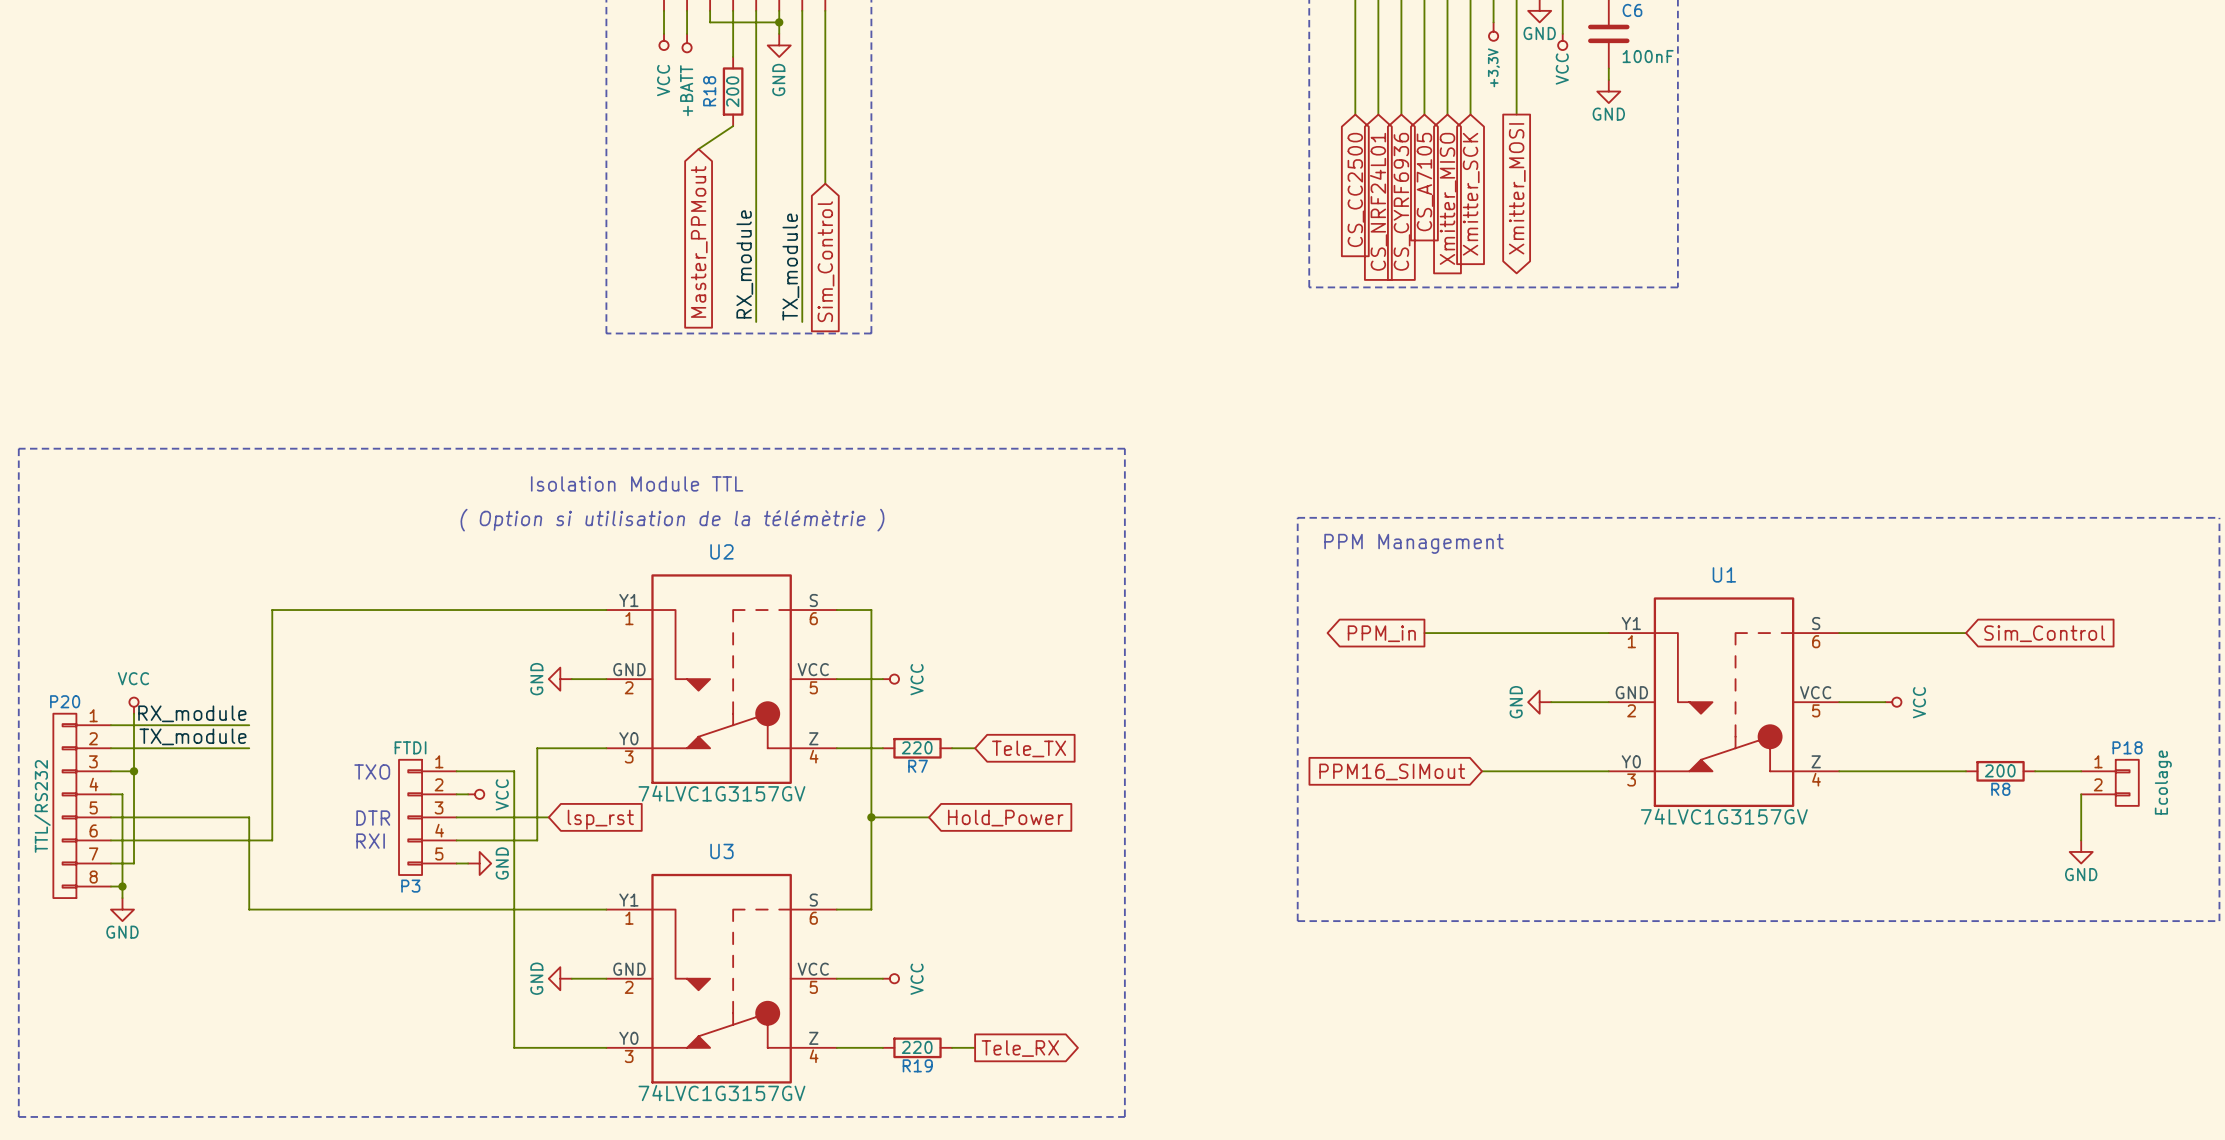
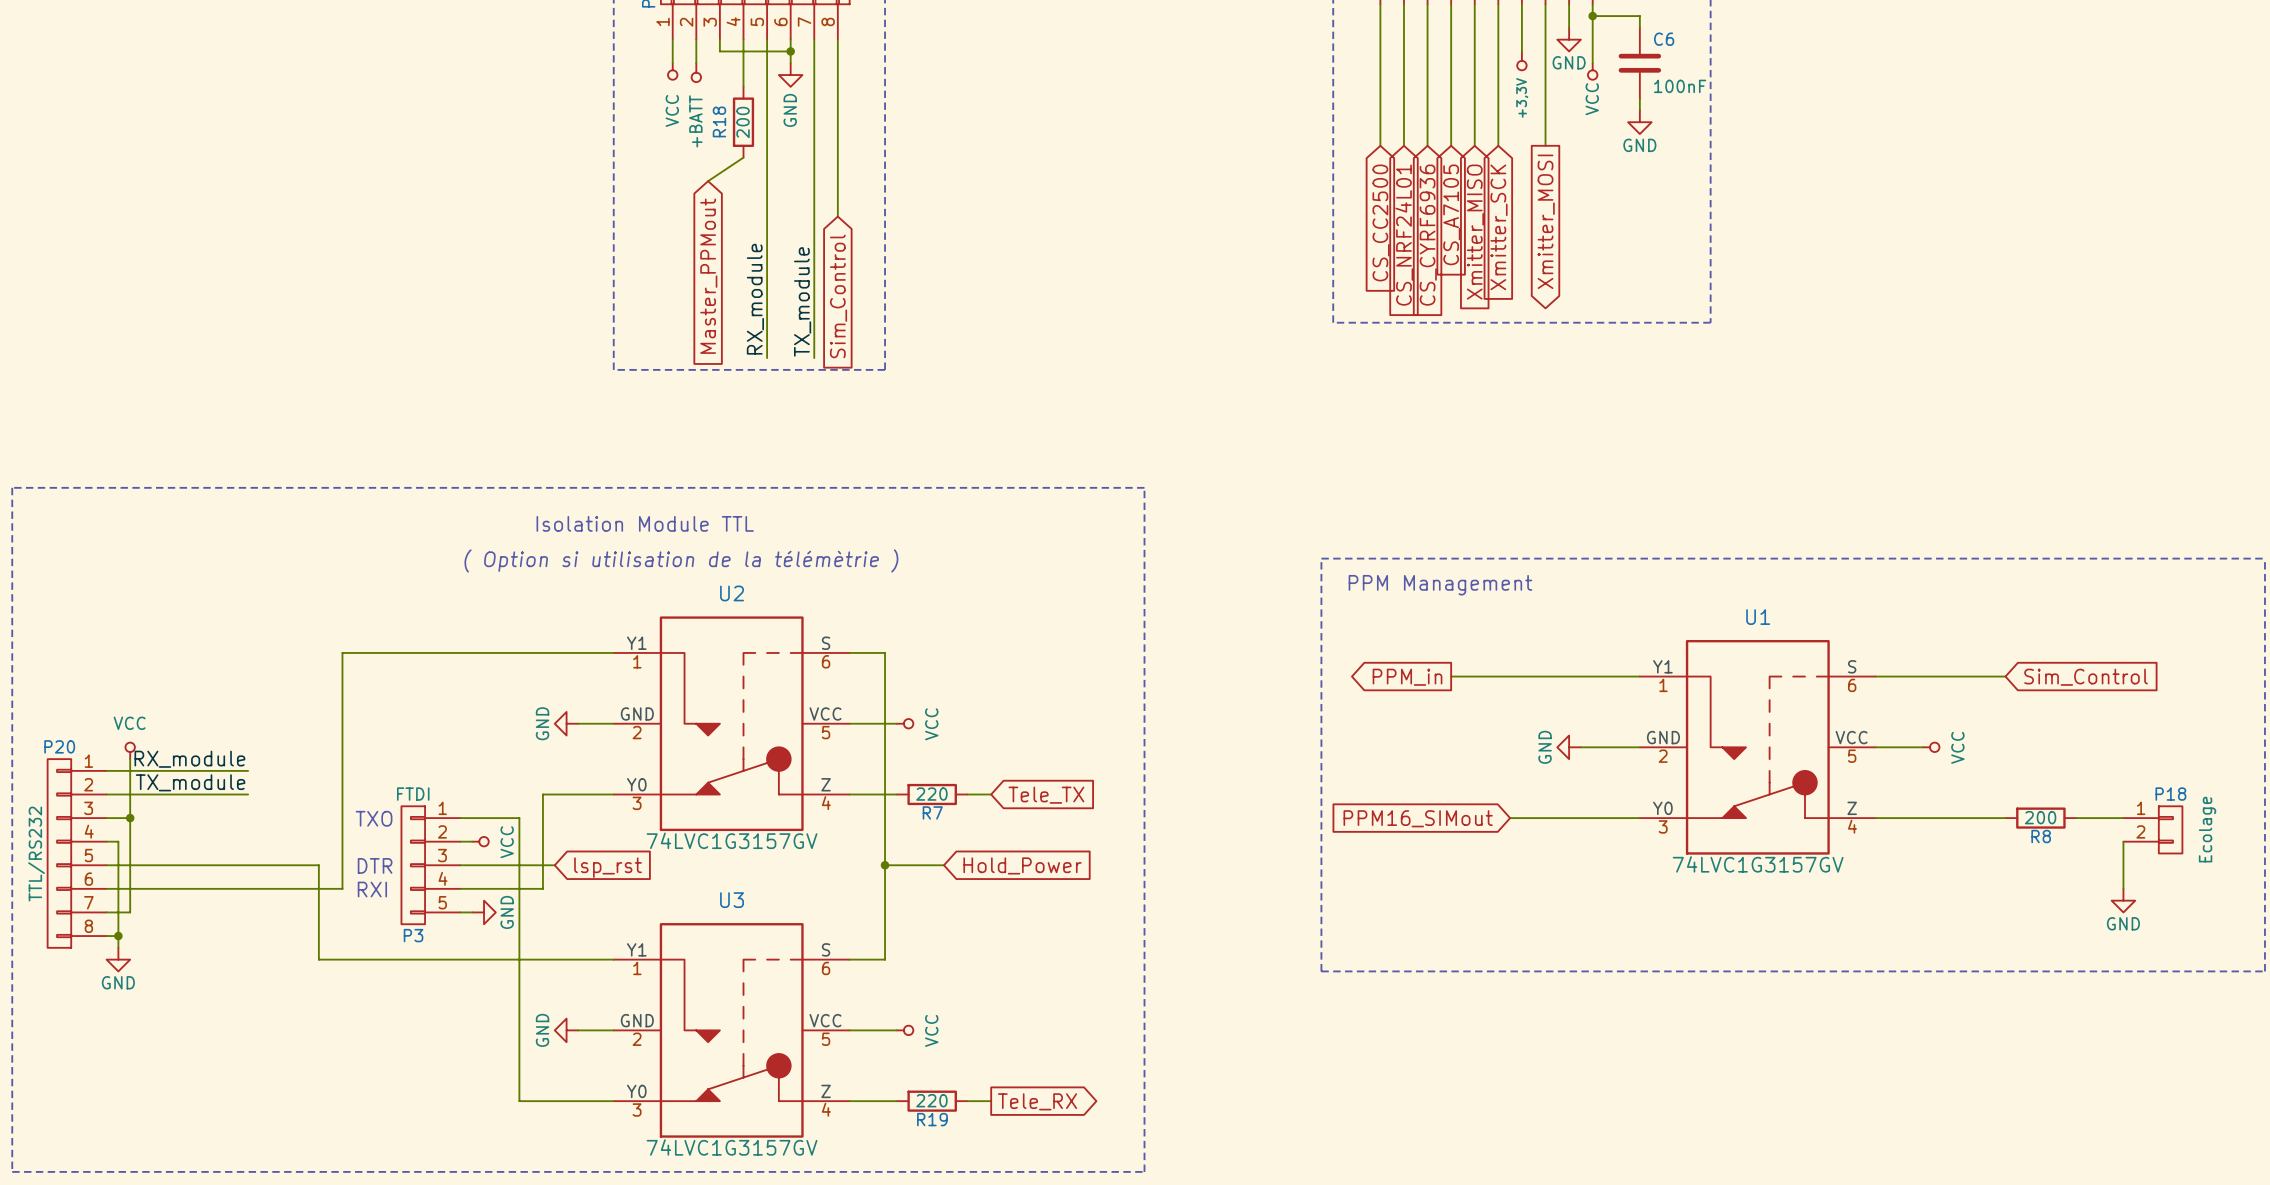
wire: (341, 610) (272, 610) (272, 840) -> (342, 652) (342, 888) (271, 888)
wire: (249, 817) (249, 909) (318, 909) -> (248, 865) (318, 865) (318, 959)

